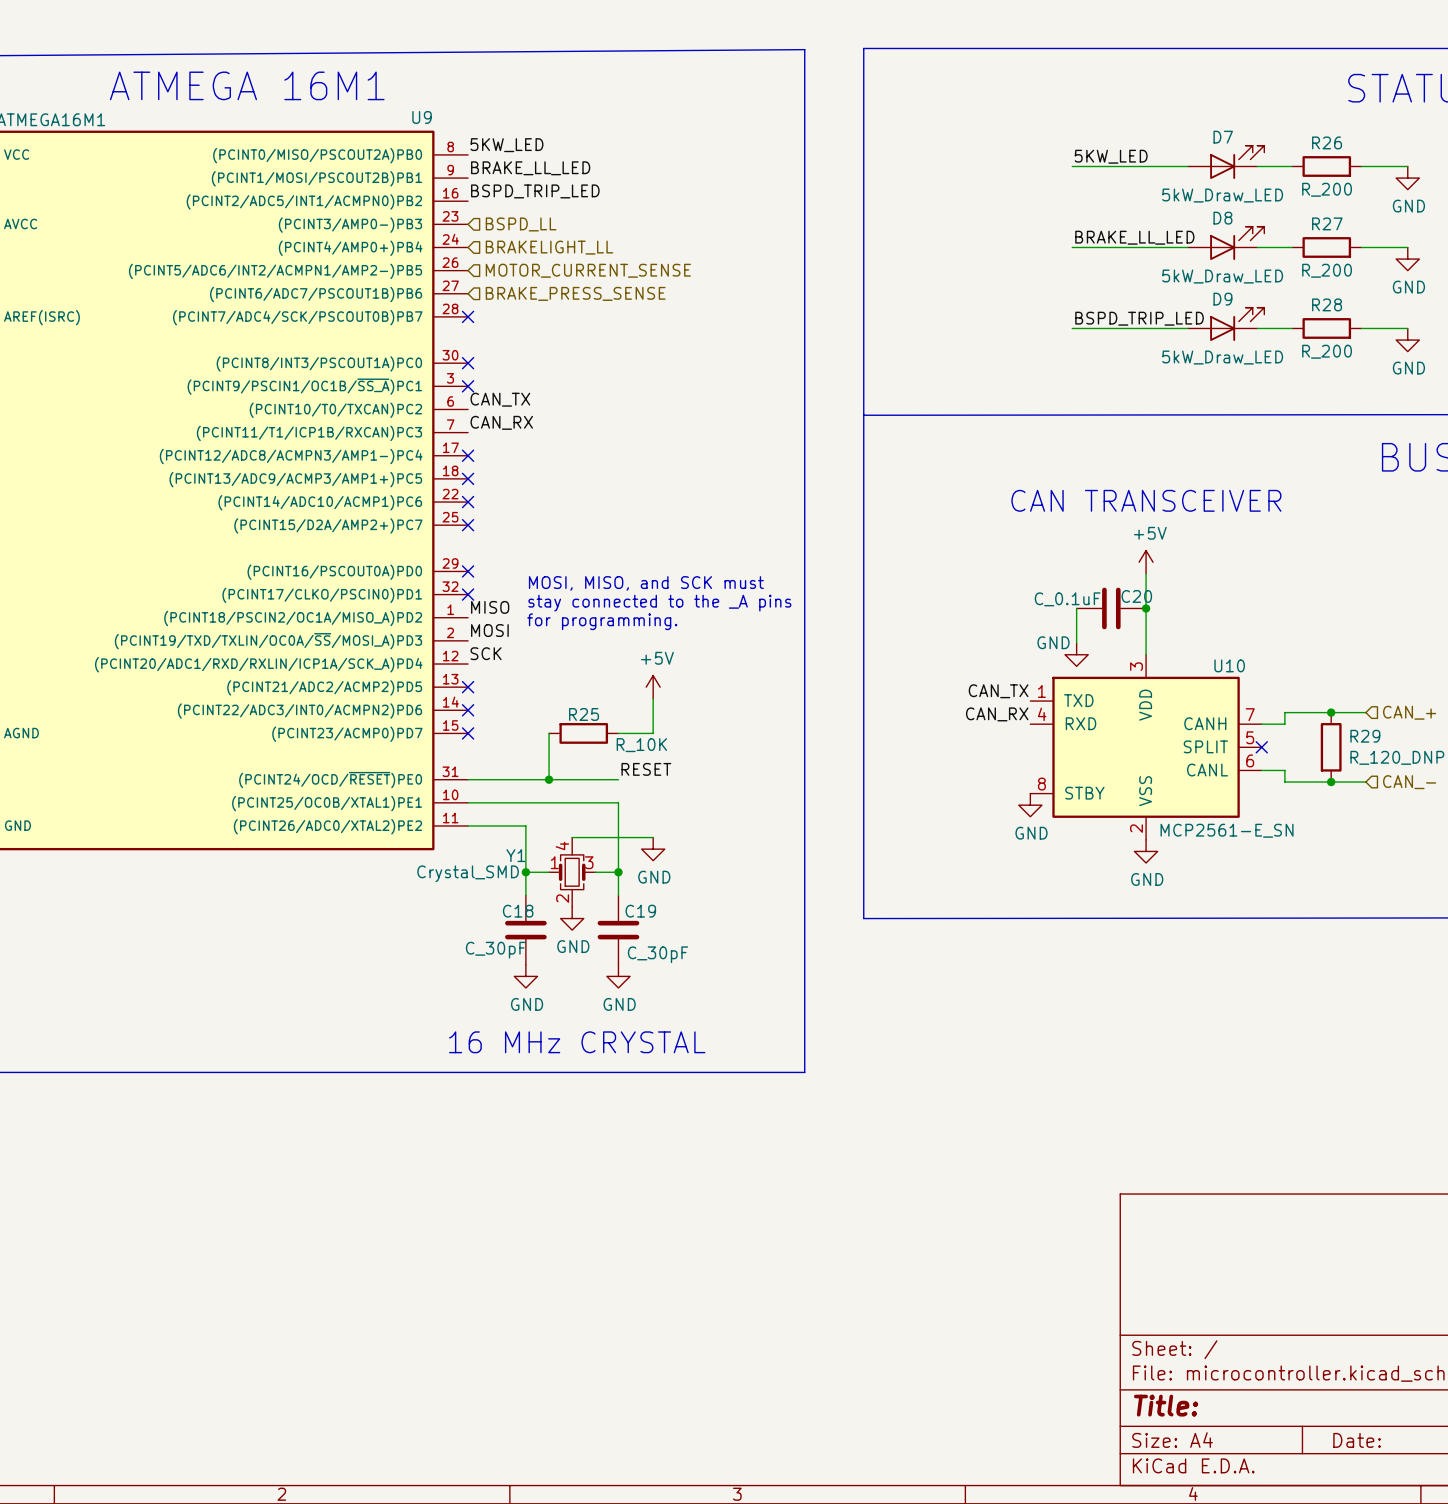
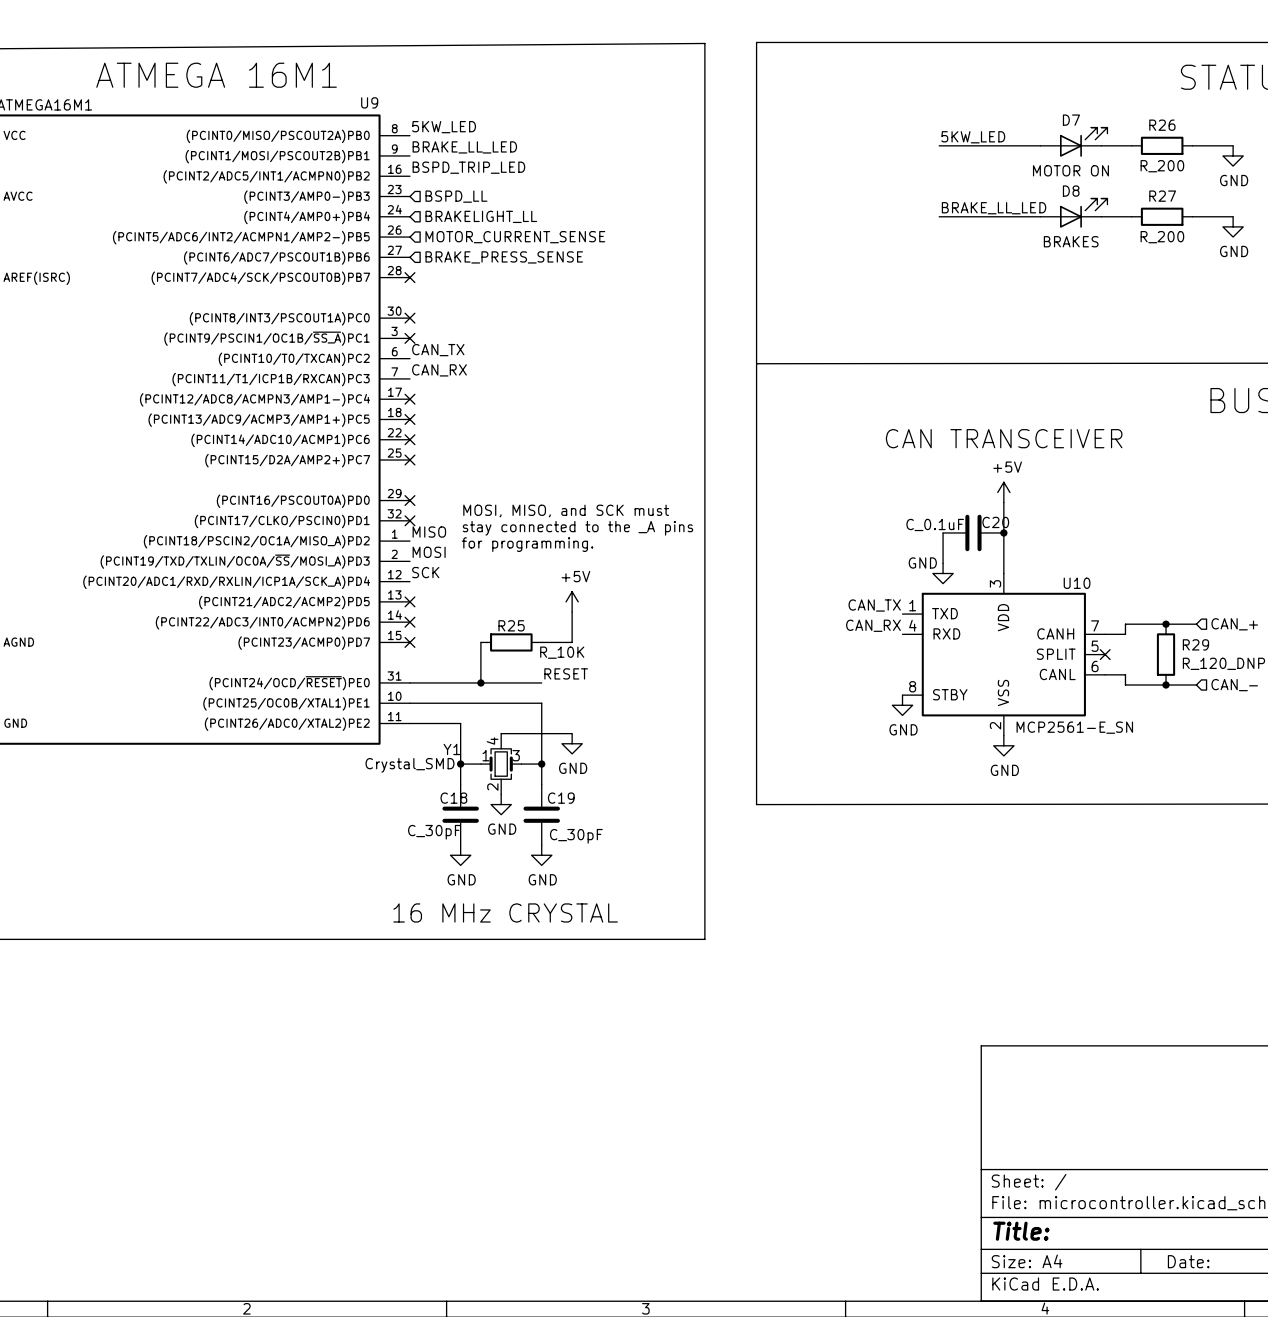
D7 value: 5kW_Draw_LED (1222, 195) -> MOTOR ON (1070, 170)
D8 value: 5kW_Draw_LED (1222, 276) -> BRAKES (1071, 241)
label: BSPD_TRIP_LED (1139, 318) -> none
D9: 5kW_Draw_LED (1226, 324) -> none
wire: (1072, 328) (1187, 328) -> none
wire: (1257, 328) (1292, 328) -> none
R28: R_200 (1326, 328) -> none
wire: (1361, 328) (1407, 328) -> none
power symbol: GND (1407, 340) -> none

